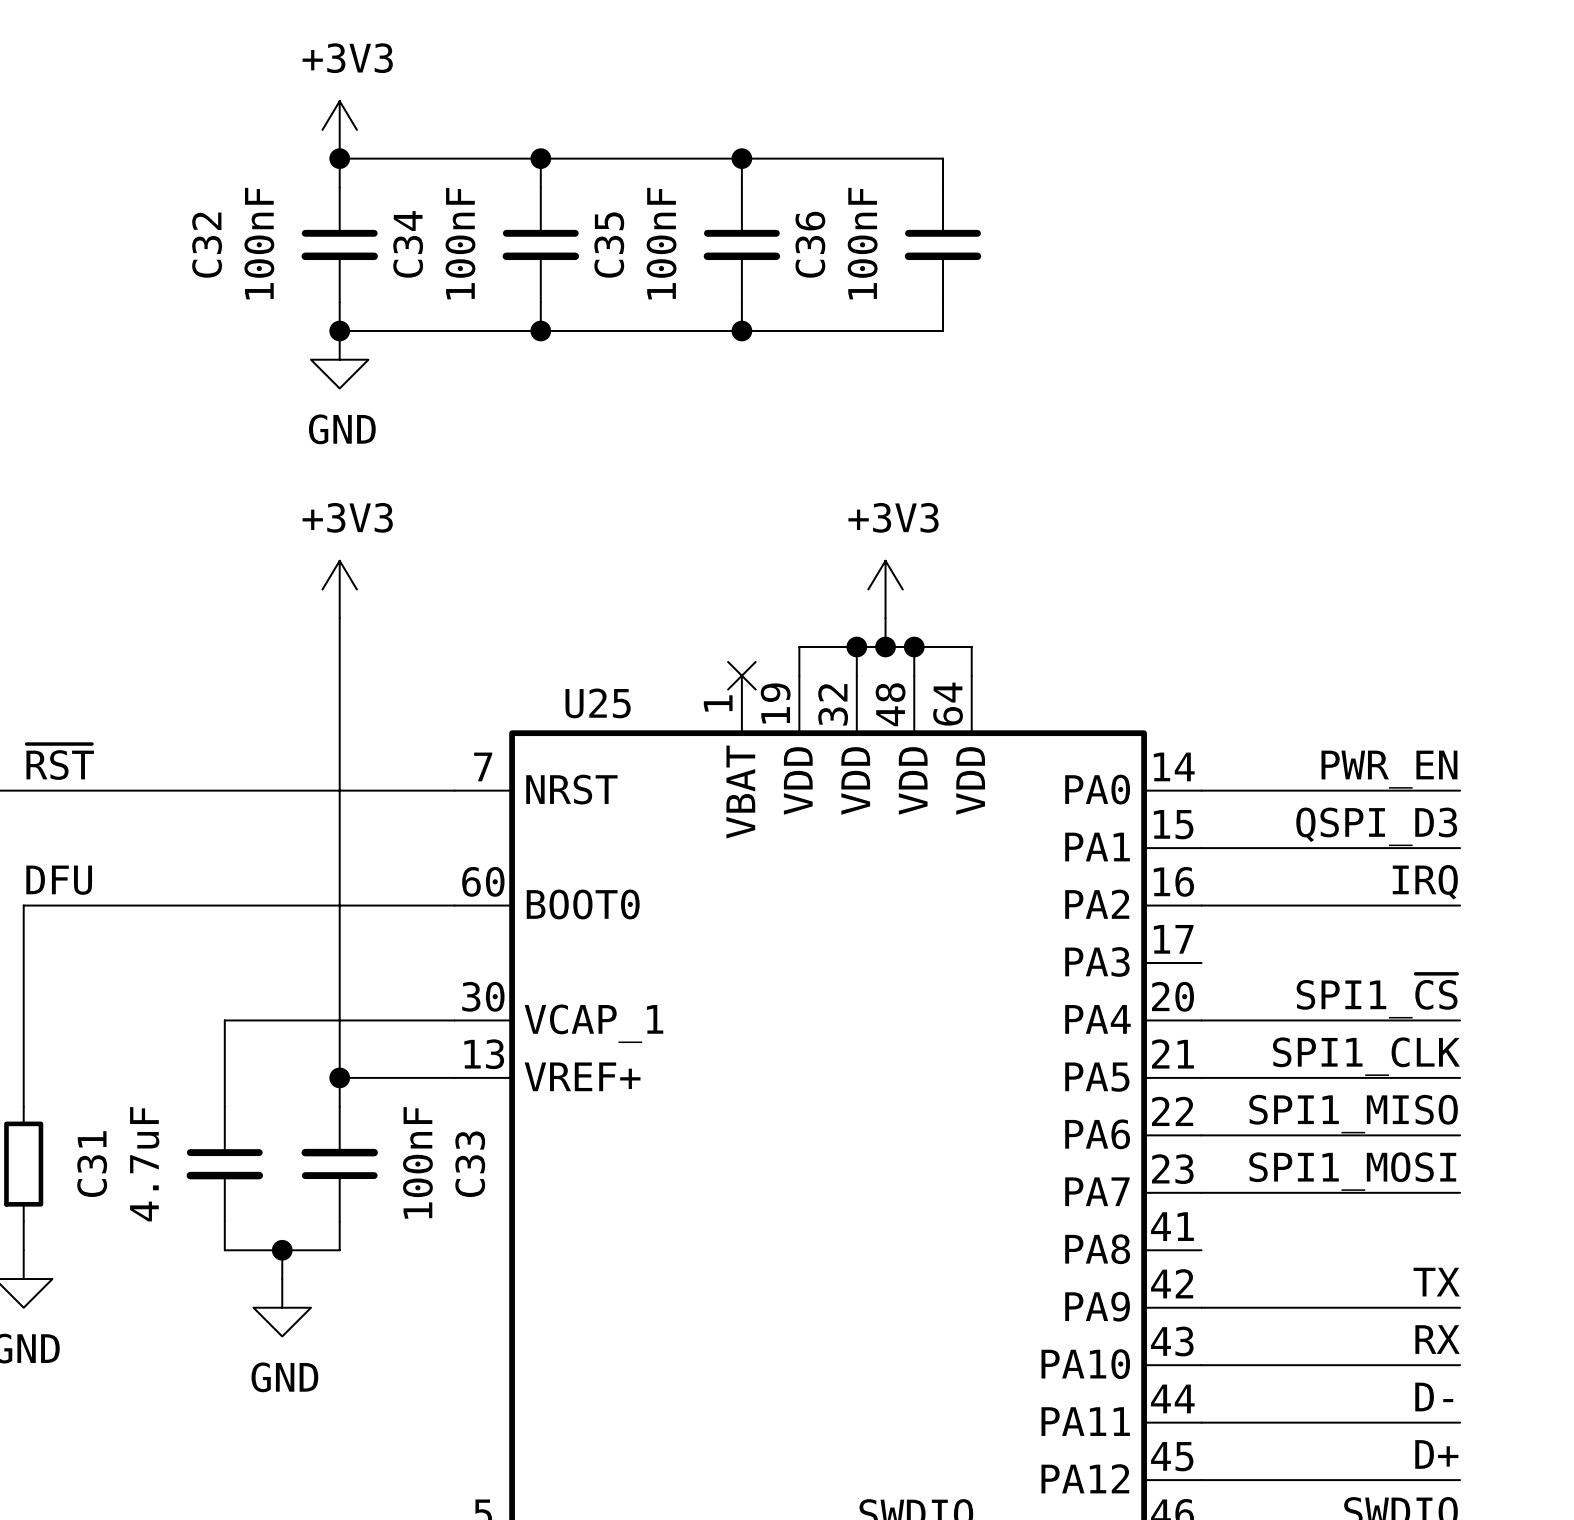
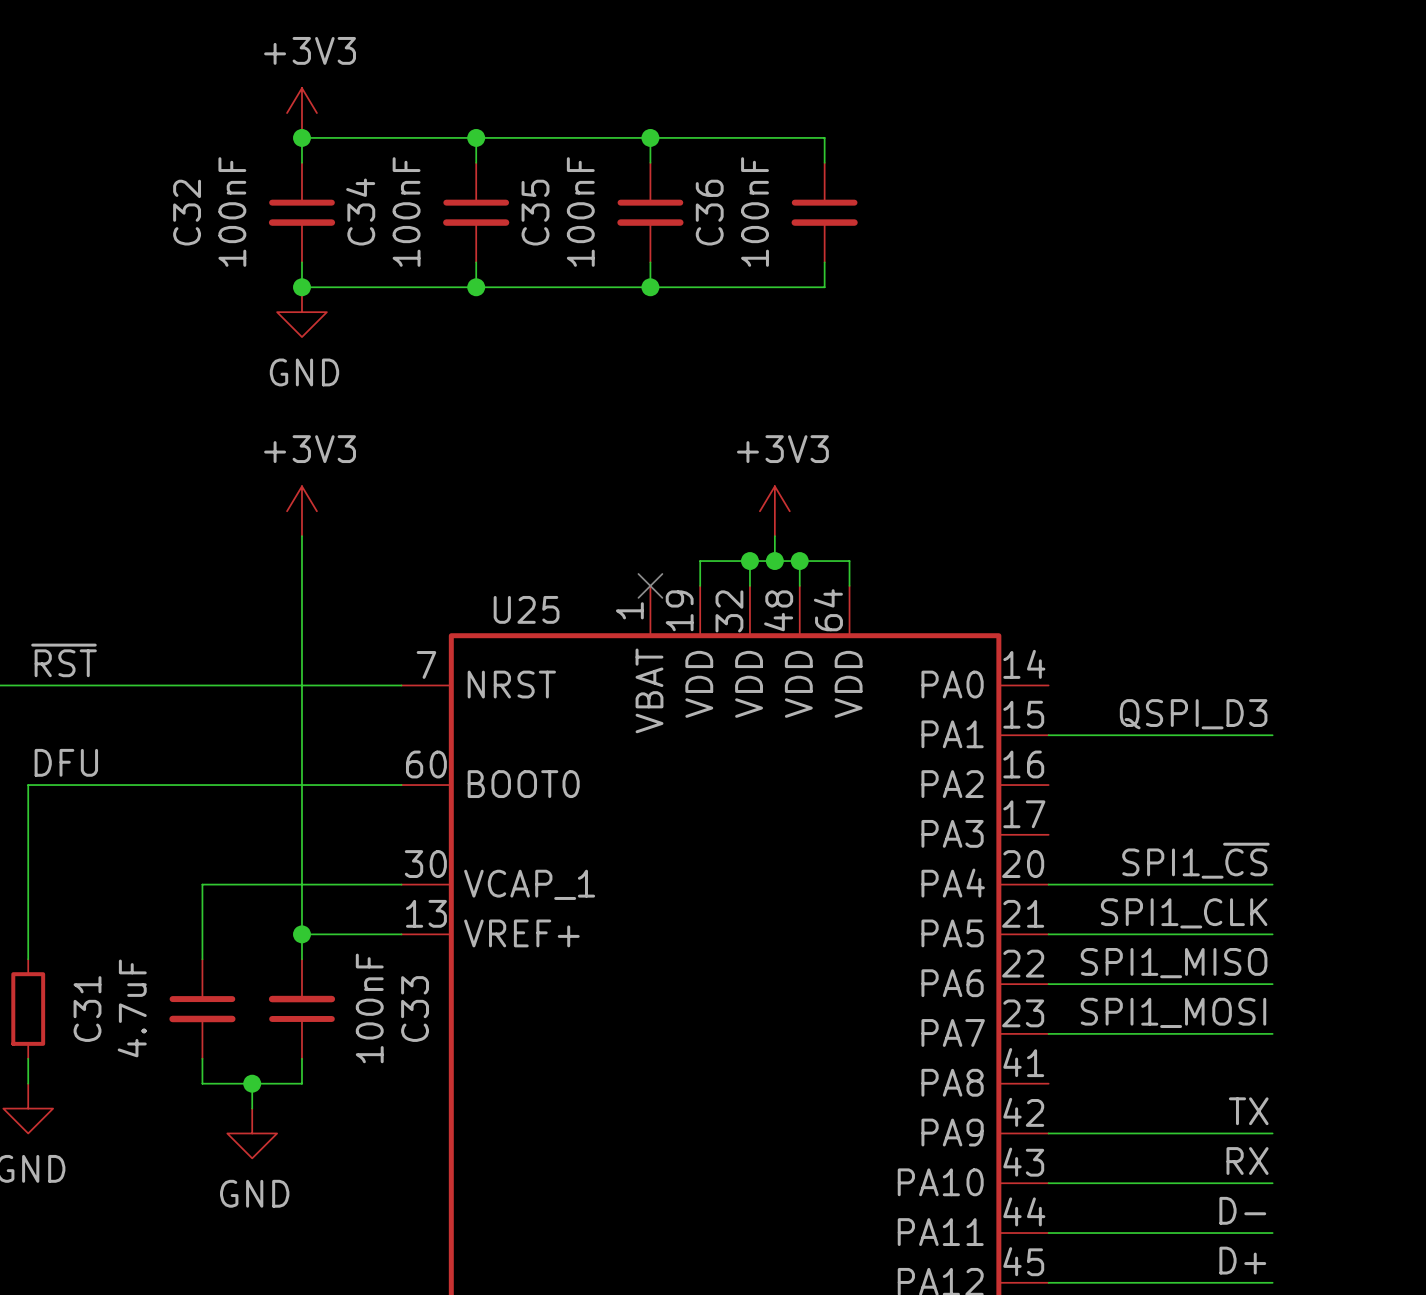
label: PWR_EN (1389, 769) -> none
wire: (1201, 790) (1460, 790) -> none
label: IRQ (1425, 882) -> none
wire: (1201, 905) (1460, 905) -> none

